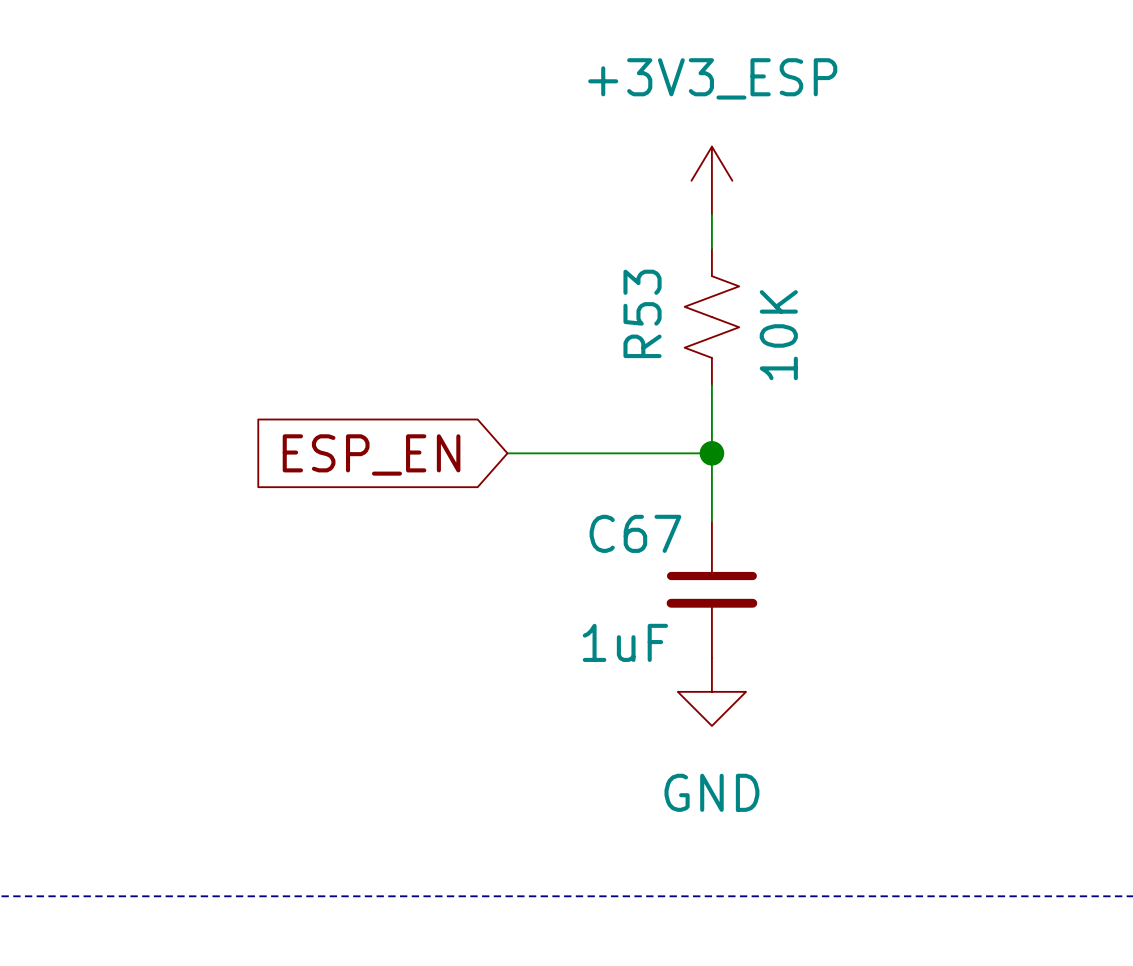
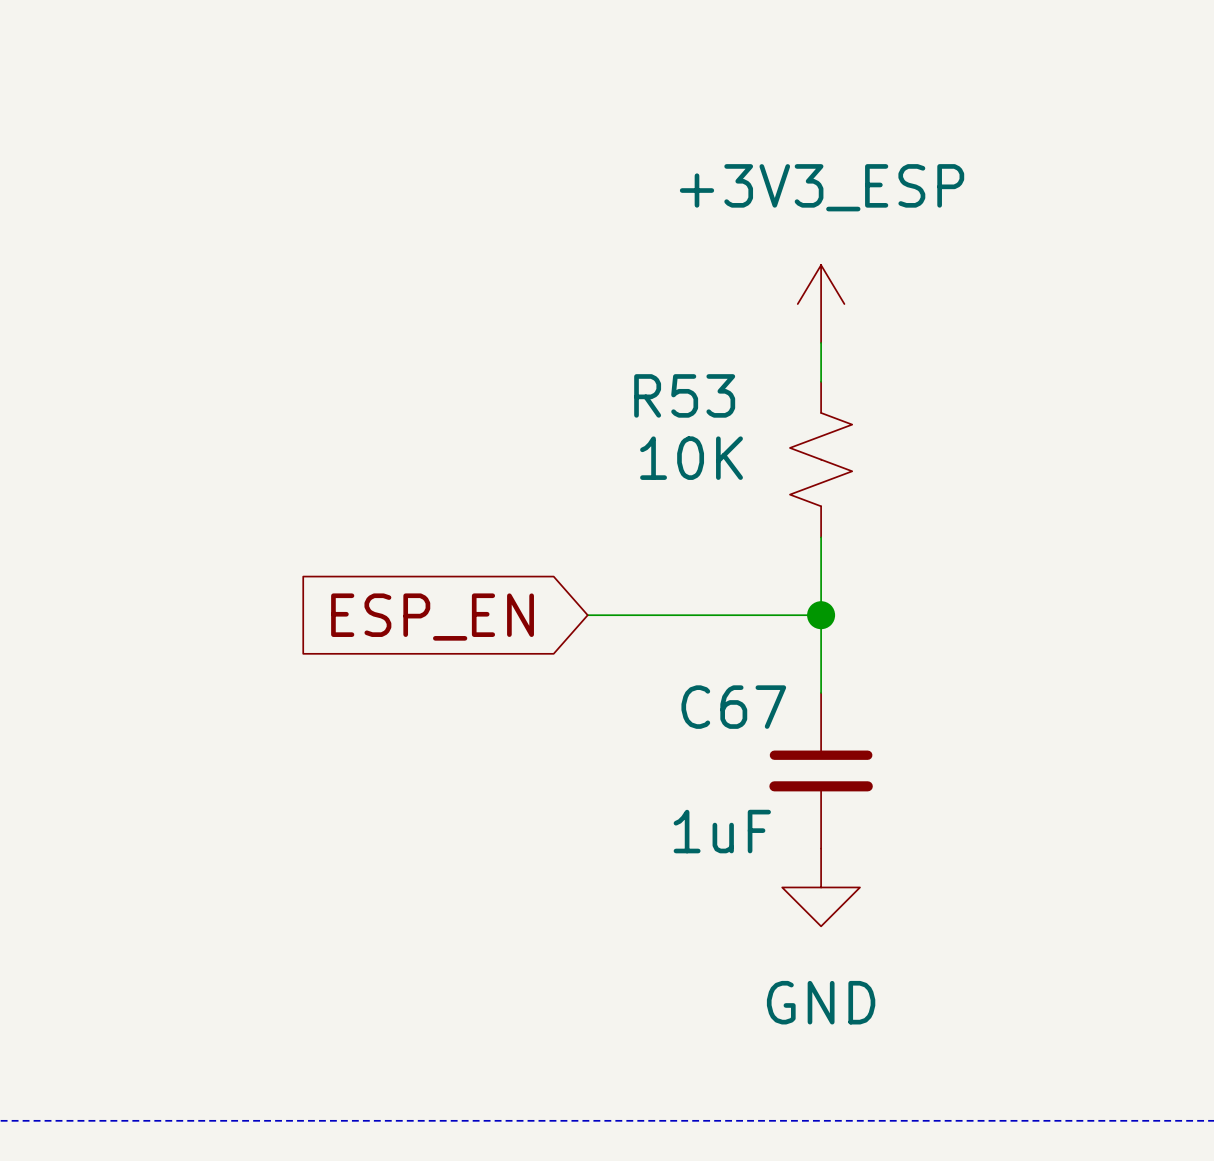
R53 name rotation: 0° (642, 313) -> 90° clockwise (684, 395)
R53 value rotation: 0° (778, 335) -> 90° clockwise (691, 458)
R53 value position: 10K (778, 335) -> 10K (691, 458)

